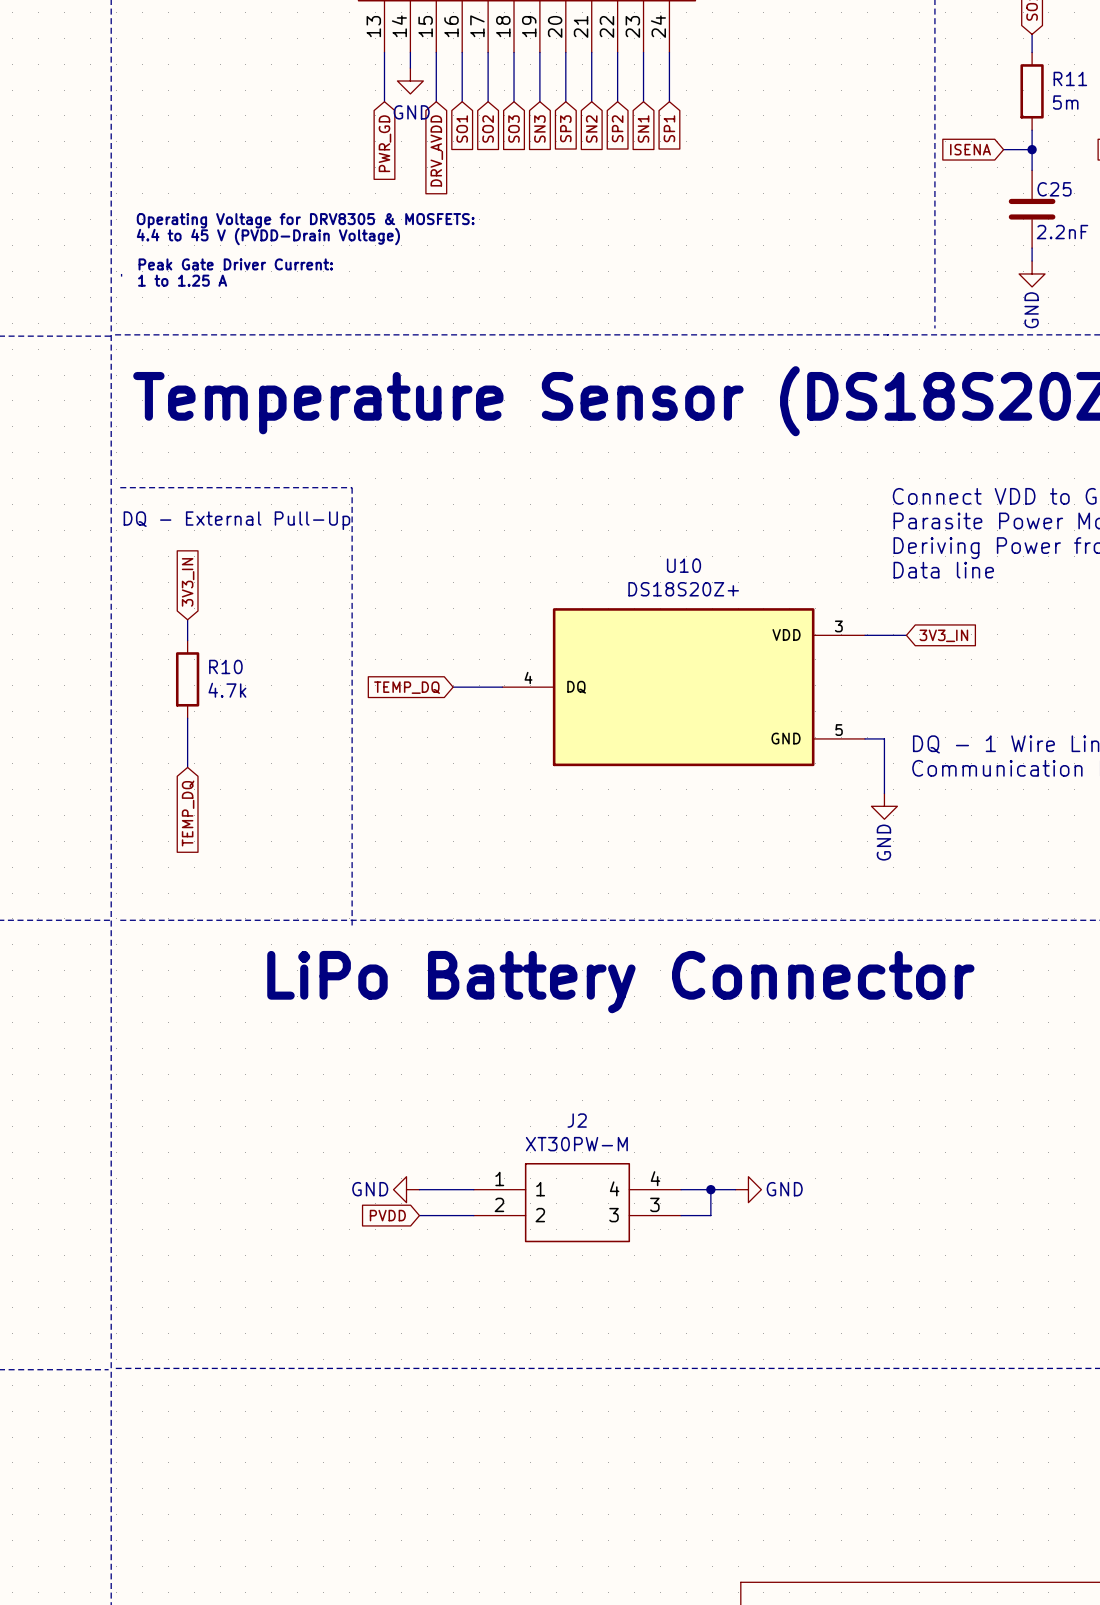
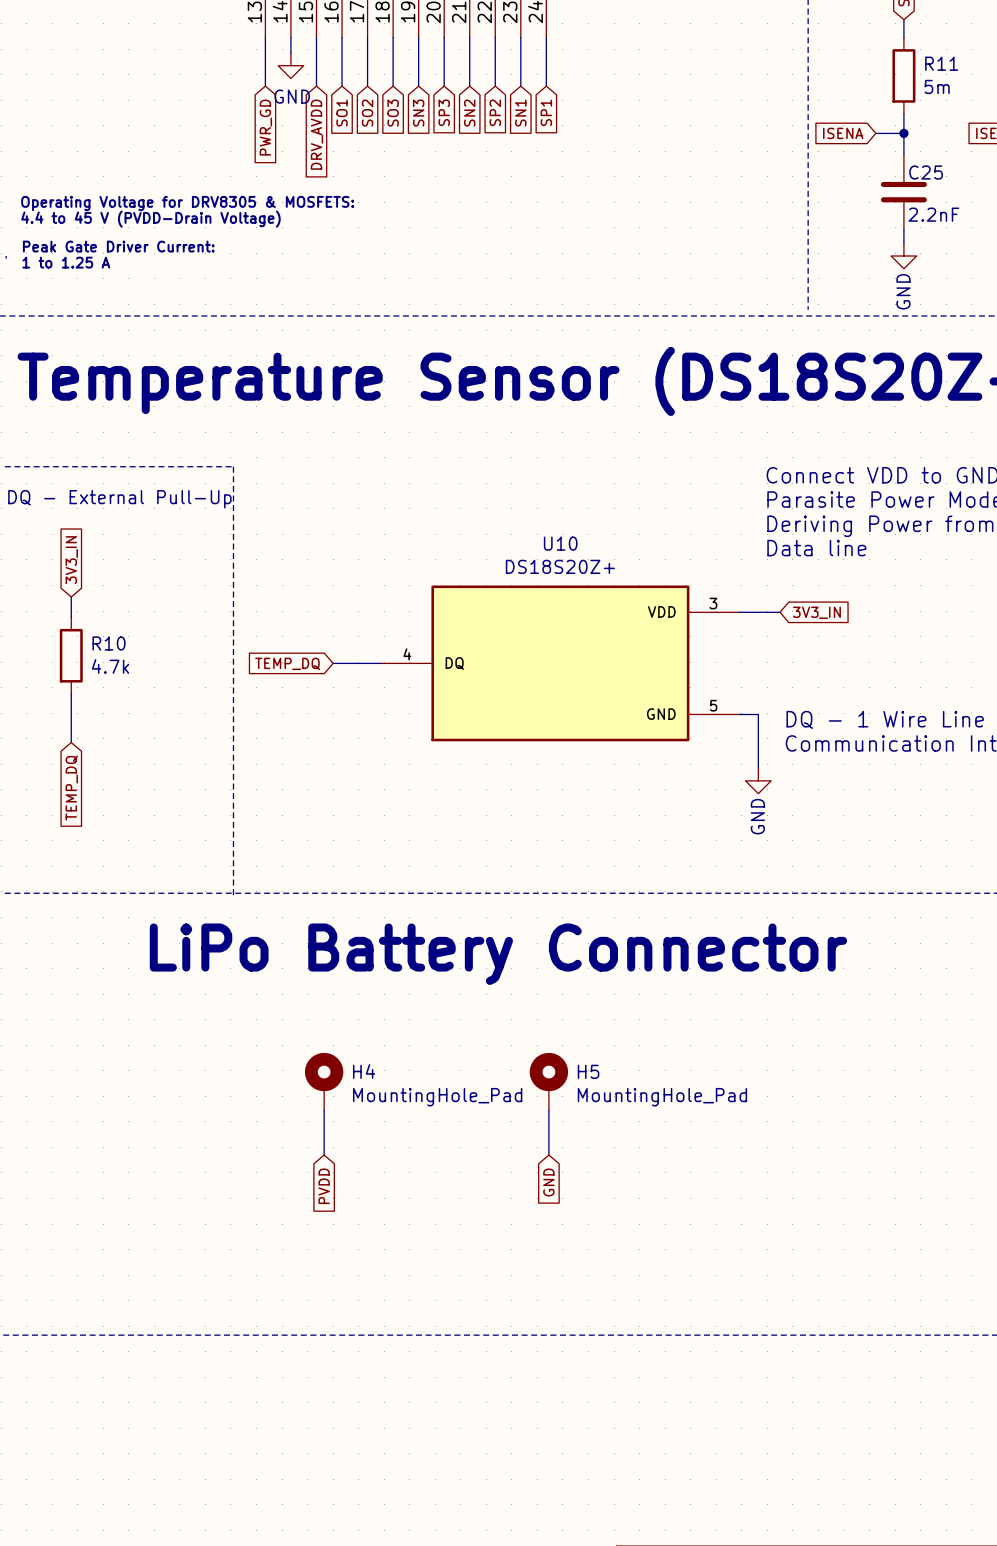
H4: none -> MountingHole_Pad (324, 1081)
H5: none -> MountingHole_Pad (548, 1081)
wire: none -> (324, 1110) (324, 1155)
wire: none -> (548, 1110) (548, 1155)
power symbol: GND (406, 1189) -> none
wire: (419, 1189) (473, 1189) -> none
wire: (681, 1189) (735, 1189) -> none
wire: (710, 1189) (710, 1215) (681, 1215) -> none
junction: (710, 1189) -> none
power symbol: GND (748, 1189) -> none
J2: XT30PW-M (577, 1202) -> none
global label: none -> GND (548, 1182)
global label rotation: 0° (387, 1215) -> 90° counterclockwise (324, 1186)
wire: (419, 1215) (473, 1215) -> none

